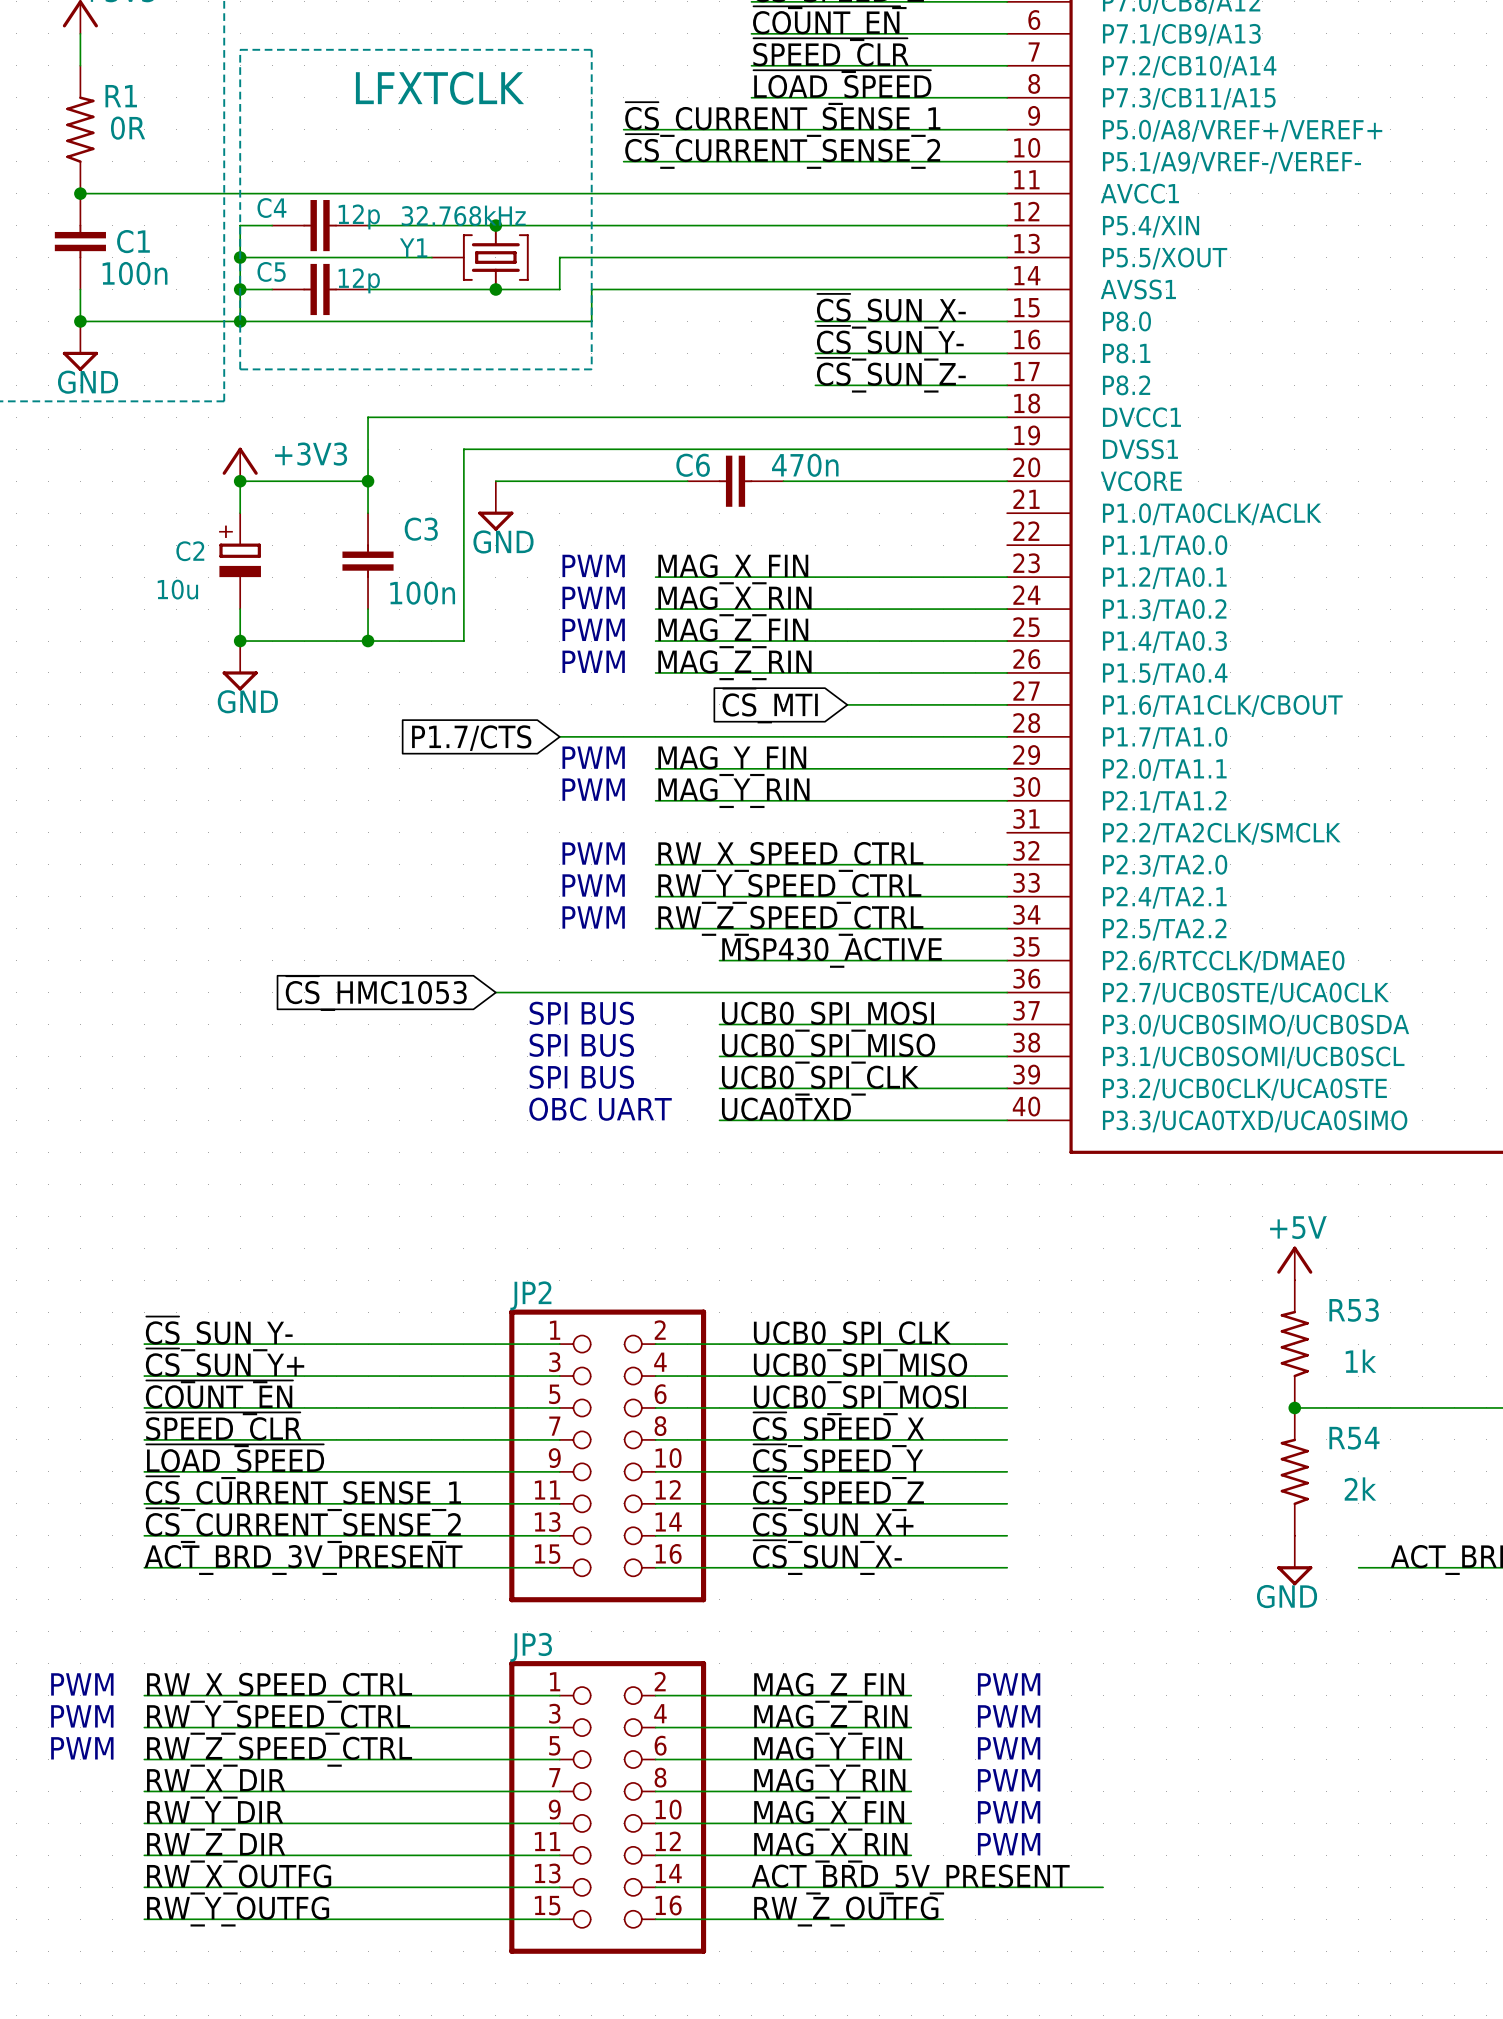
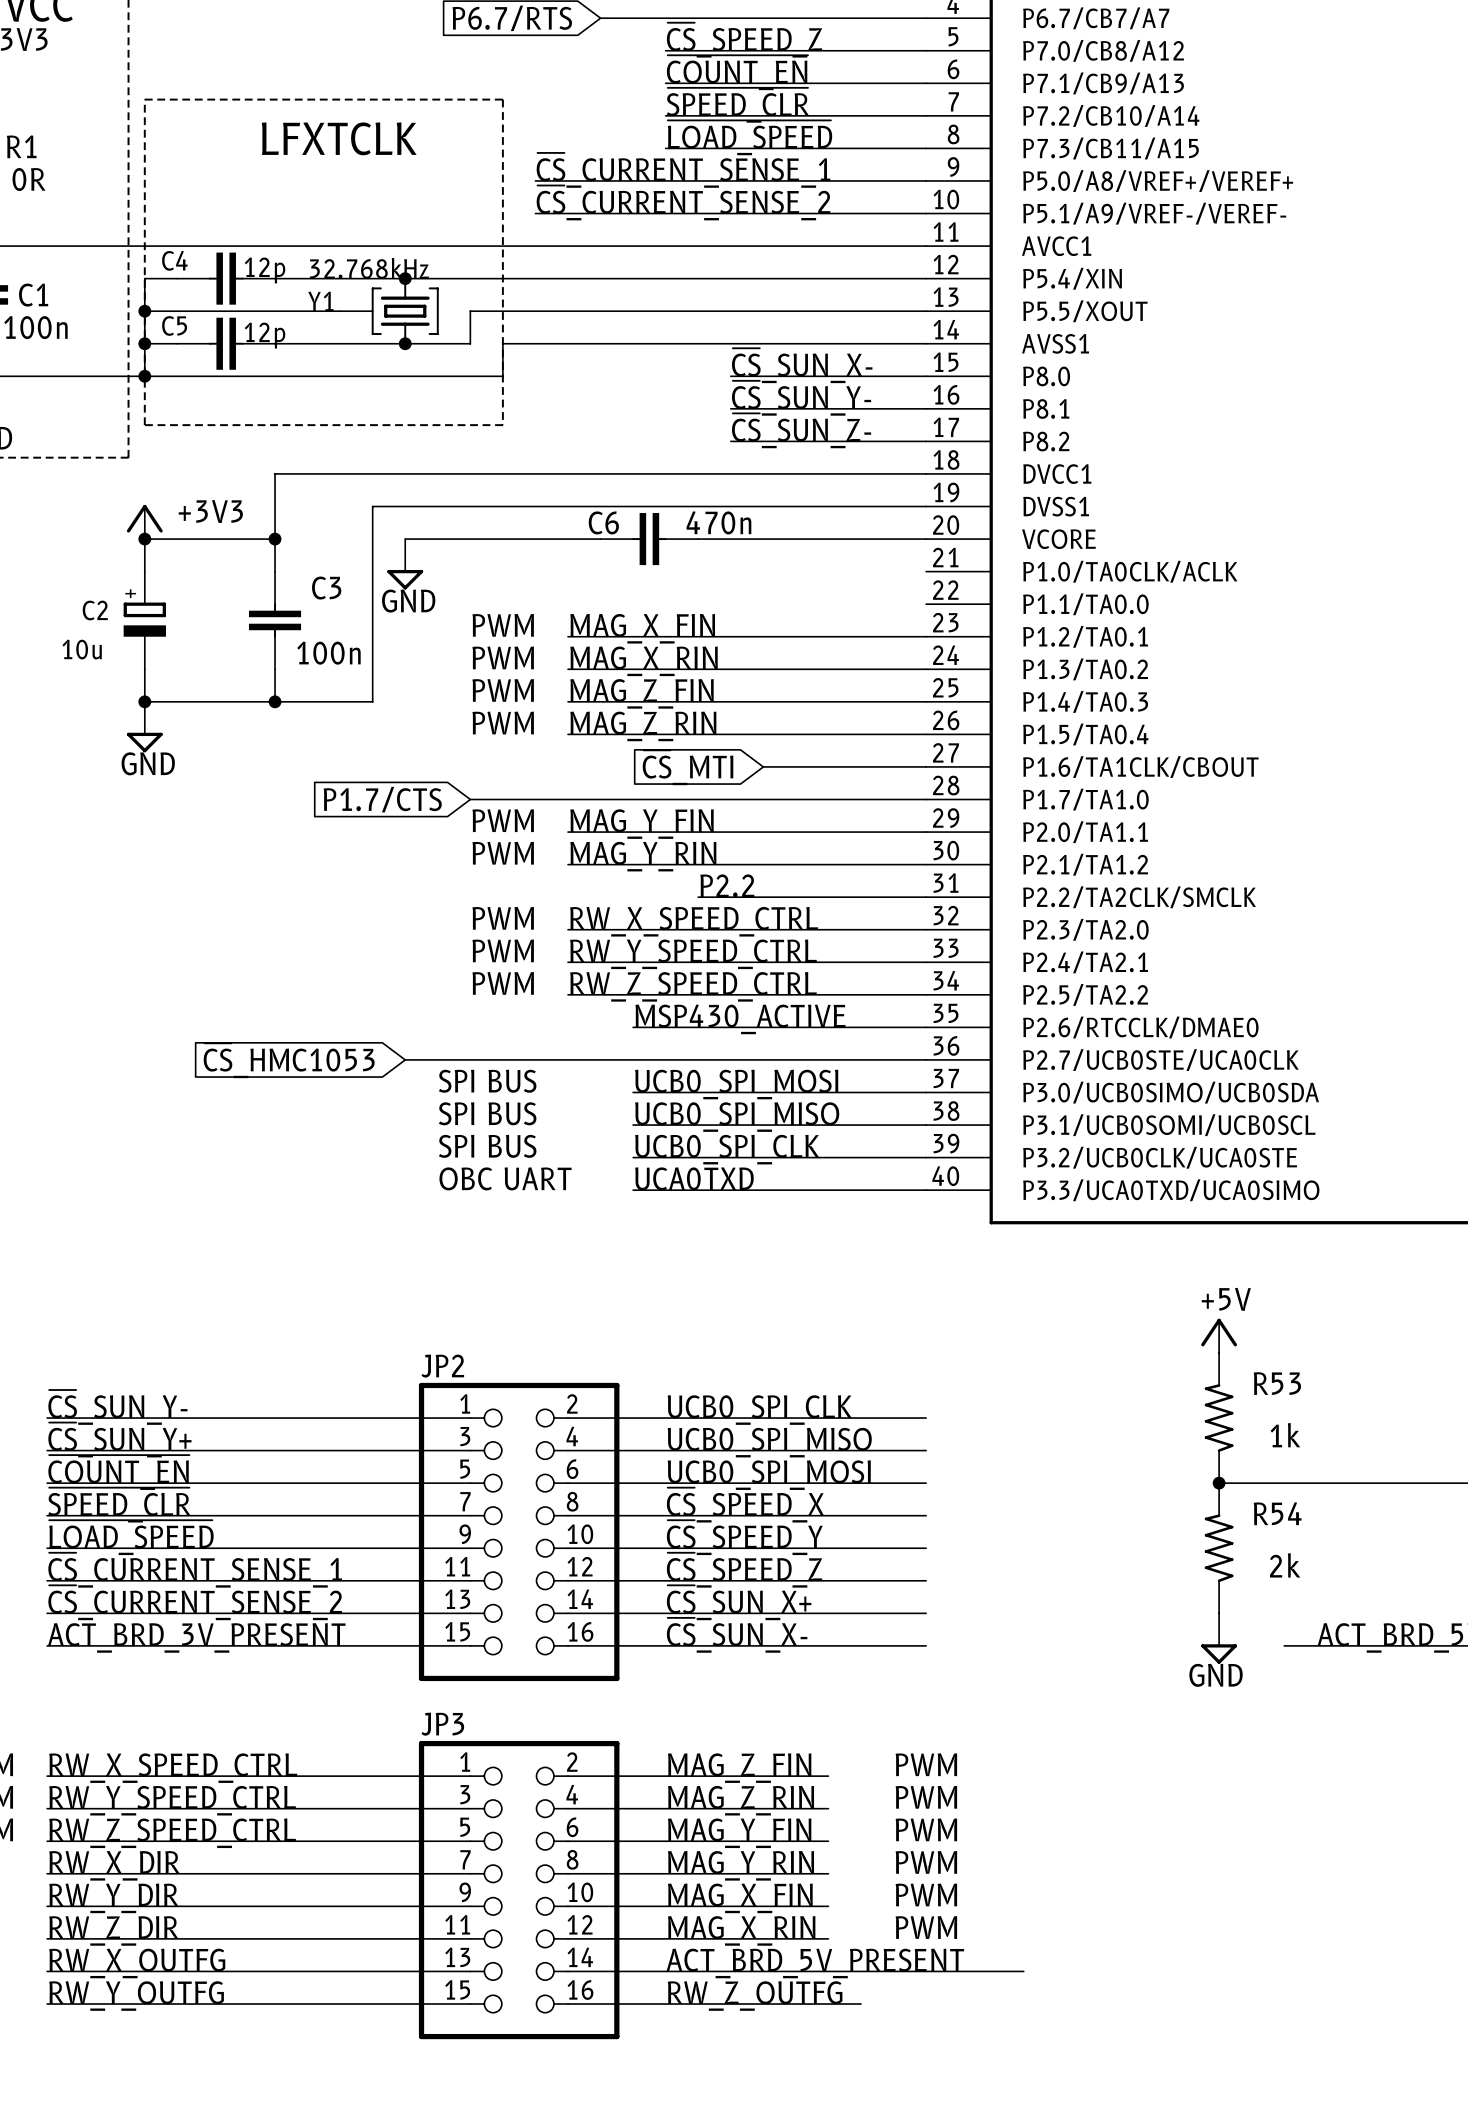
label: none -> P2.2 (727, 885)
wire: none -> (698, 897) (926, 897)

